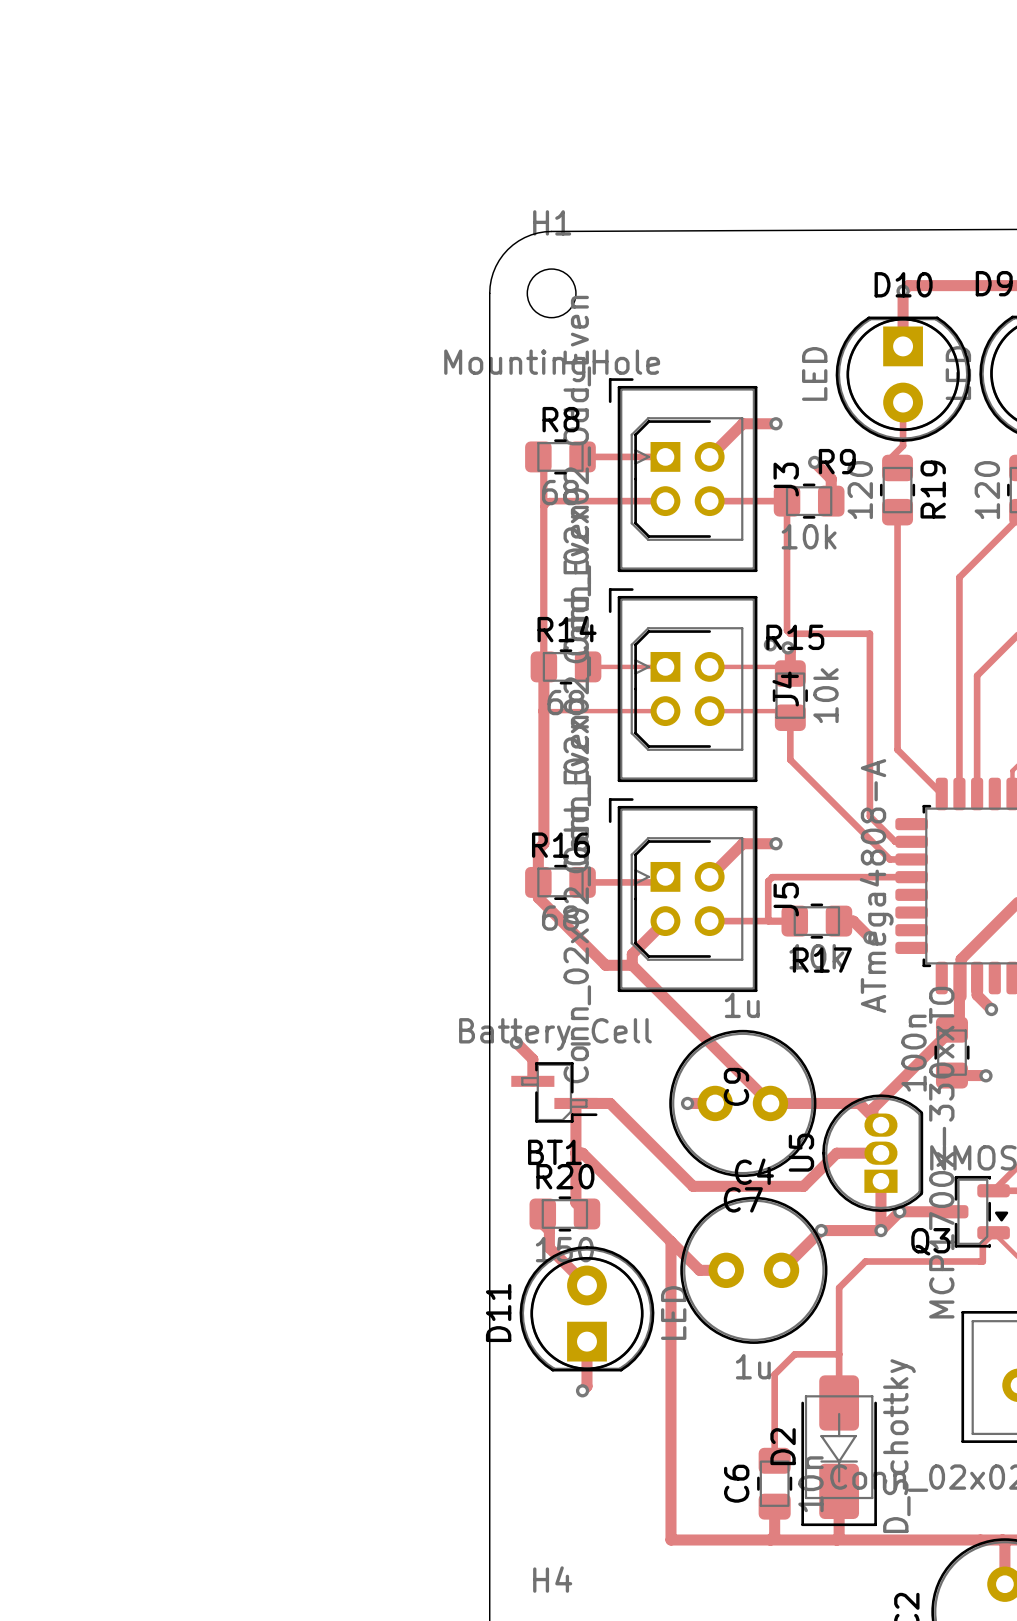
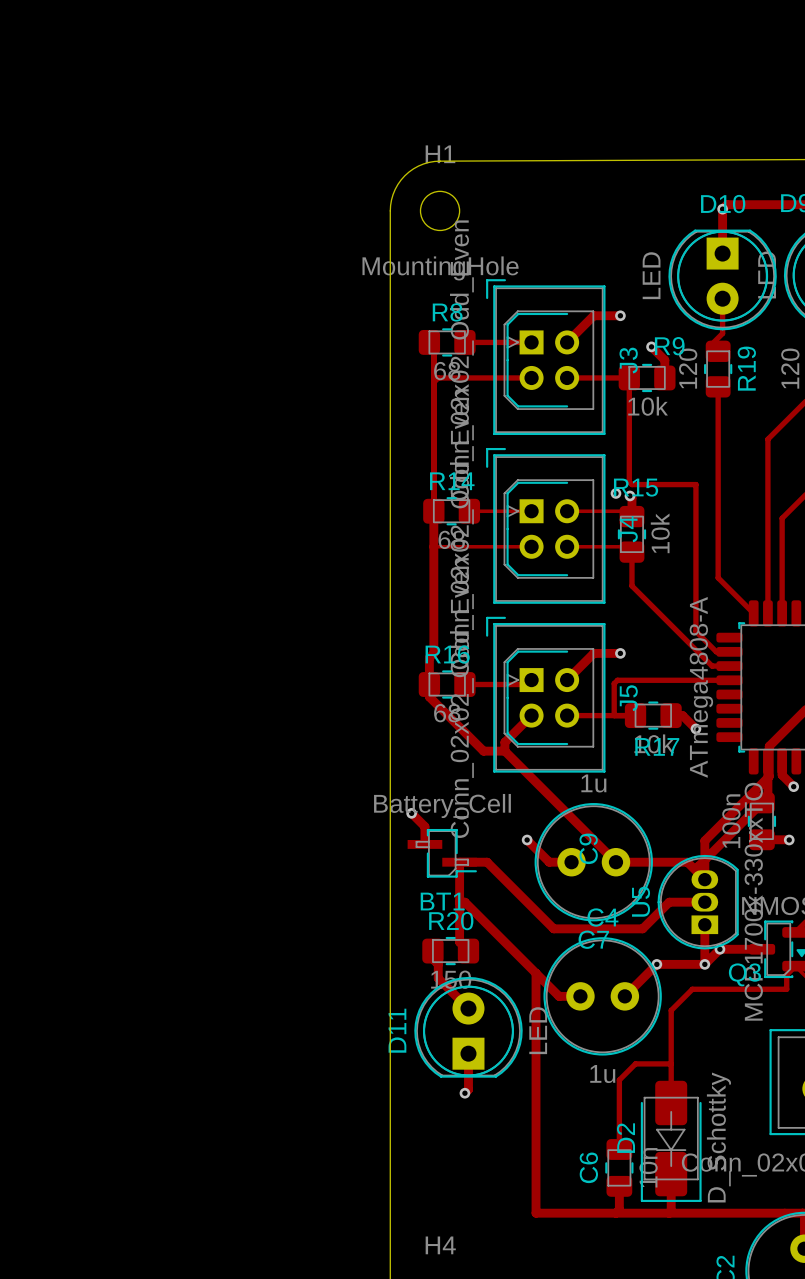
track: none -> (769, 776) (704, 840) (704, 879)
track: none -> (527, 839) (549, 862)
via position: (687, 1103) -> (527, 839)

